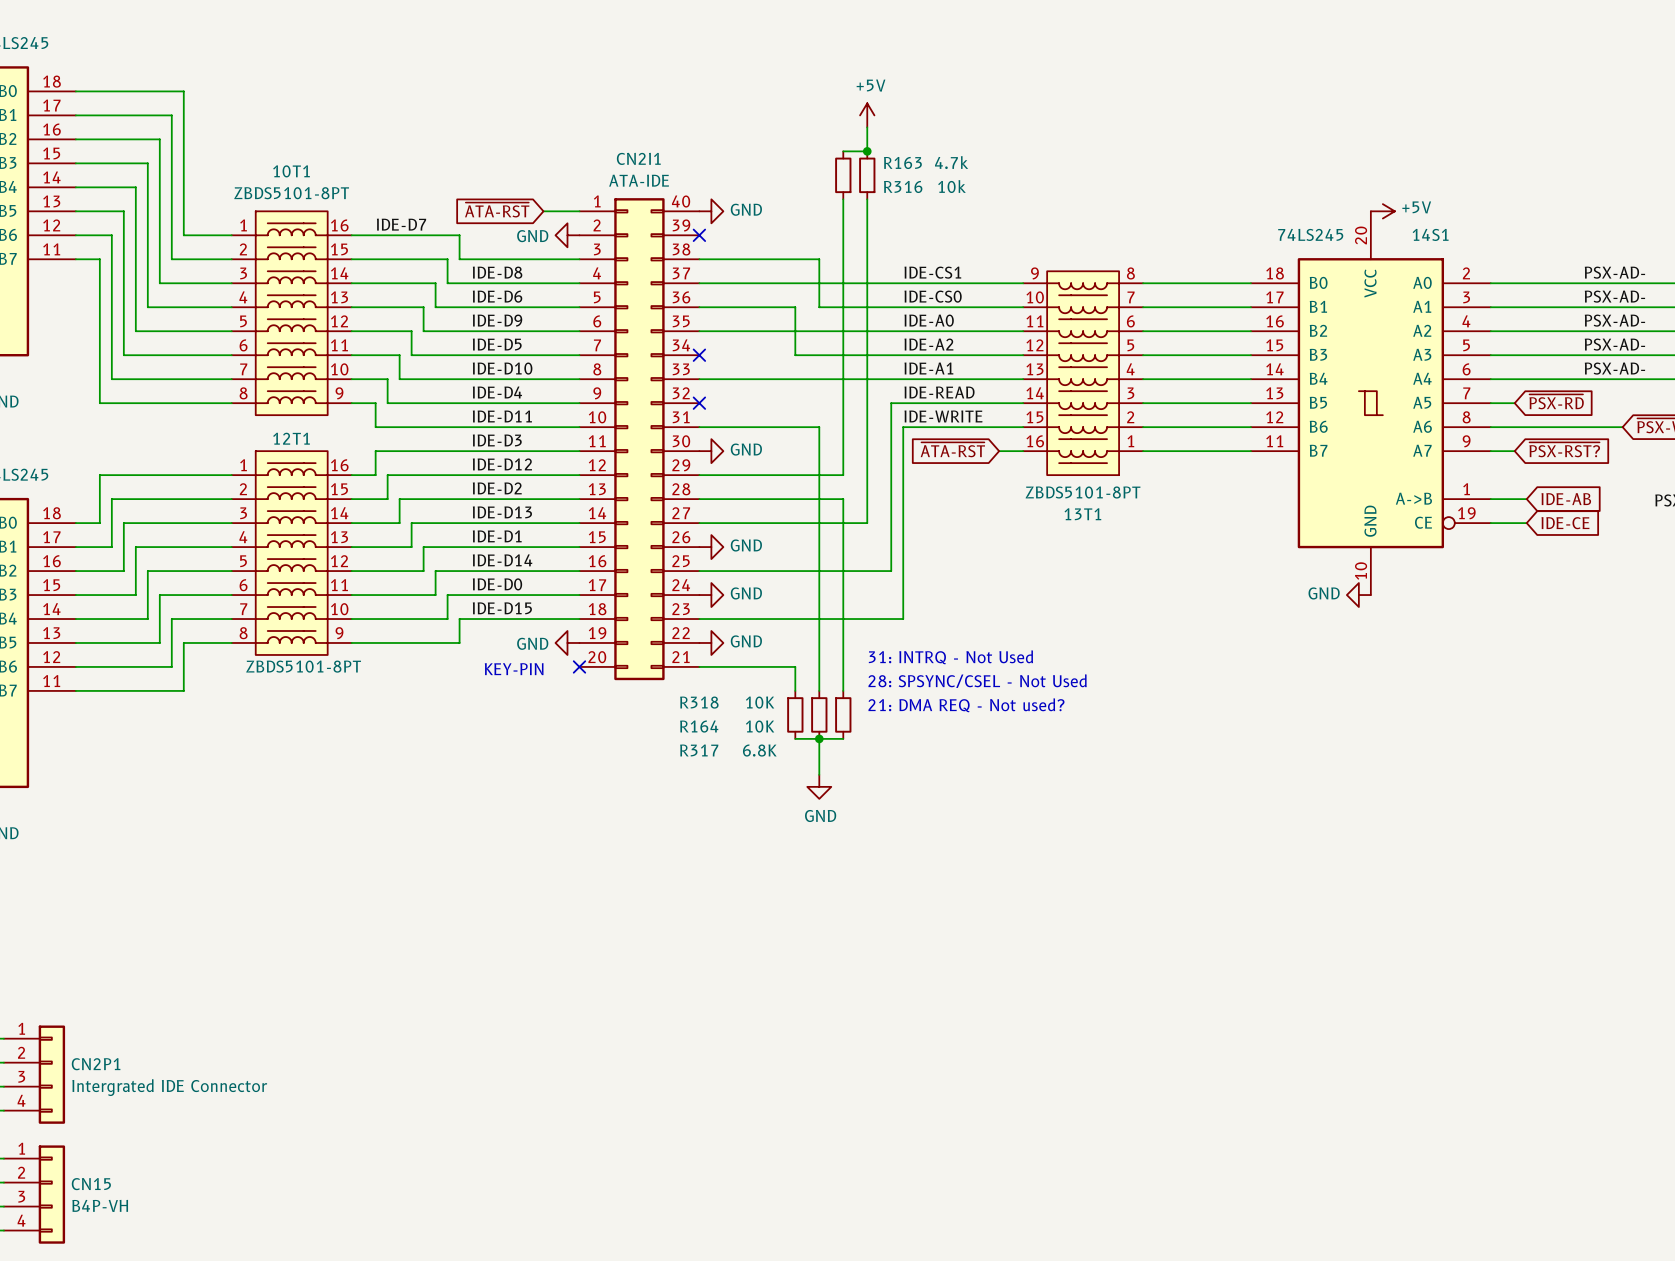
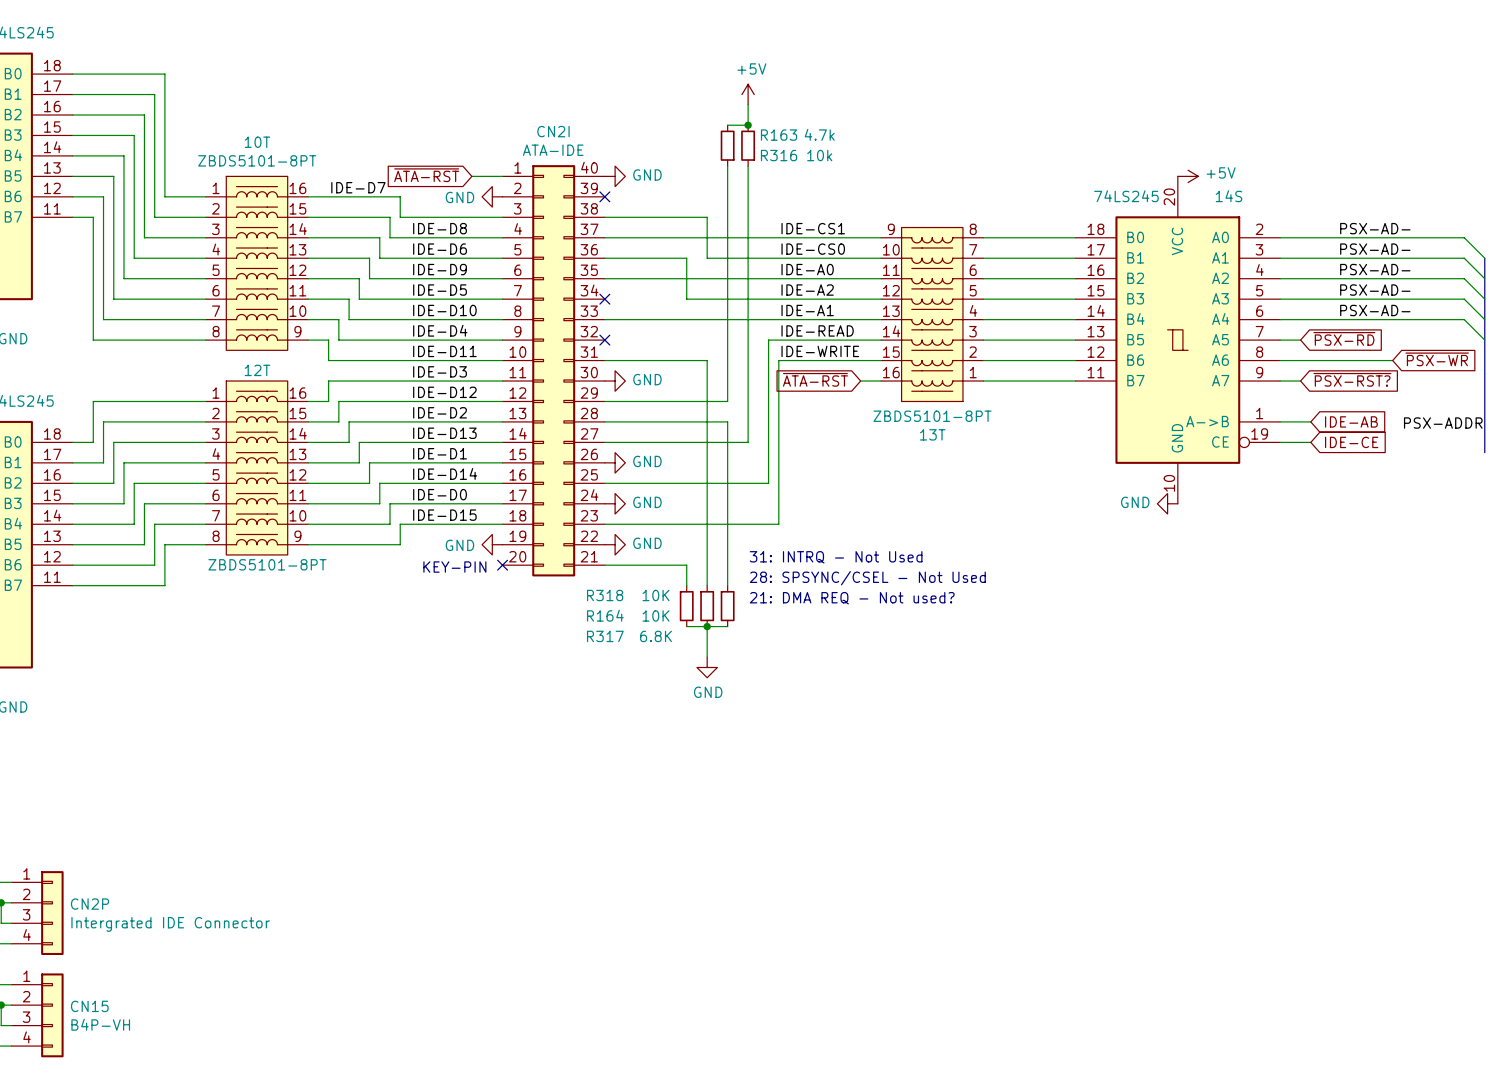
CN2I1 name: CN2I1 (638, 158) -> CN2I (553, 131)
10T1 name: 10T1 (291, 171) -> 10T (257, 142)
14S1 name: 14S1 (1430, 234) -> 14S (1228, 196)
12T1 name: 12T1 (291, 438) -> 12T (257, 370)
13T1 name: 13T1 (1082, 514) -> 13T (932, 434)
CN2P1 name: CN2P1 (96, 1064) -> CN2P (90, 904)

